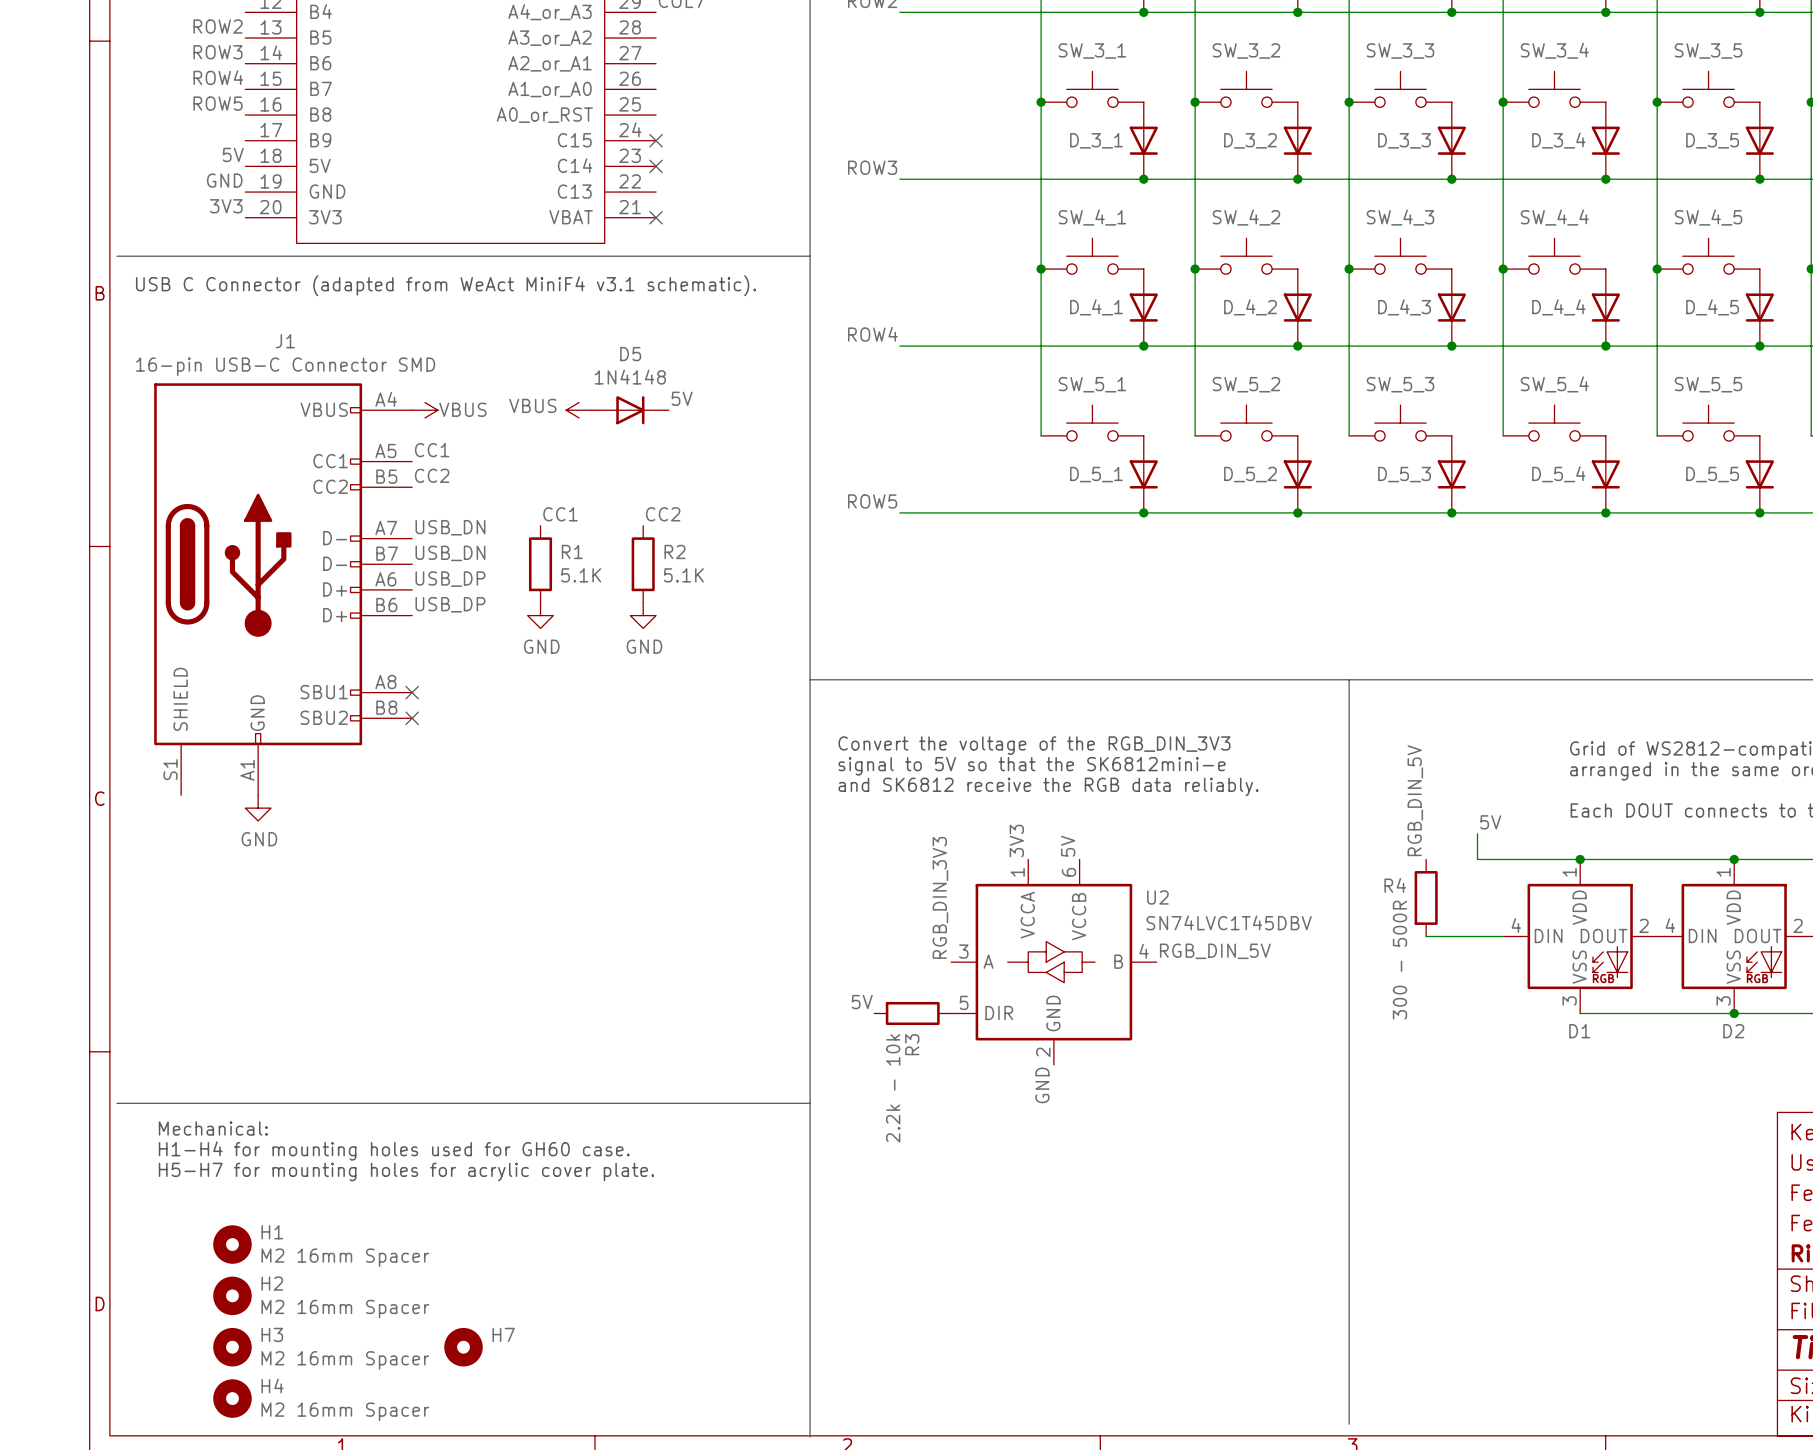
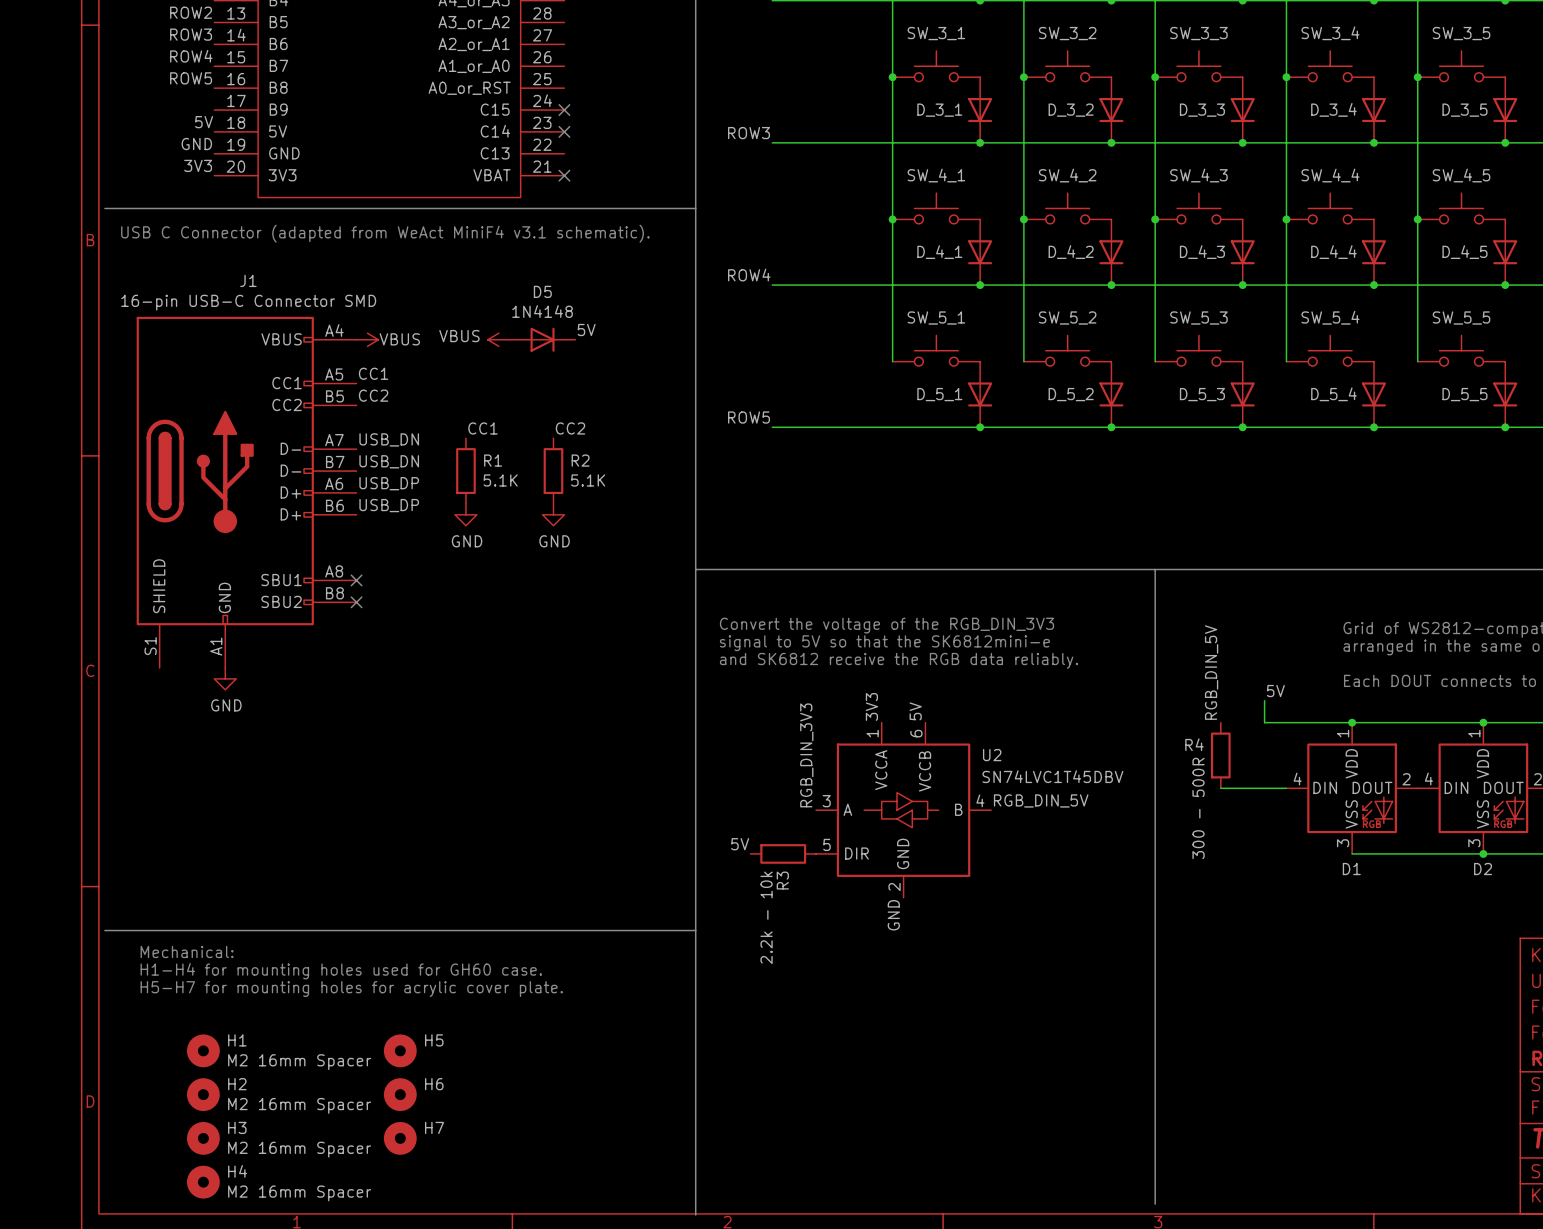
H5: none -> (400, 1050)
H6: none -> (400, 1094)

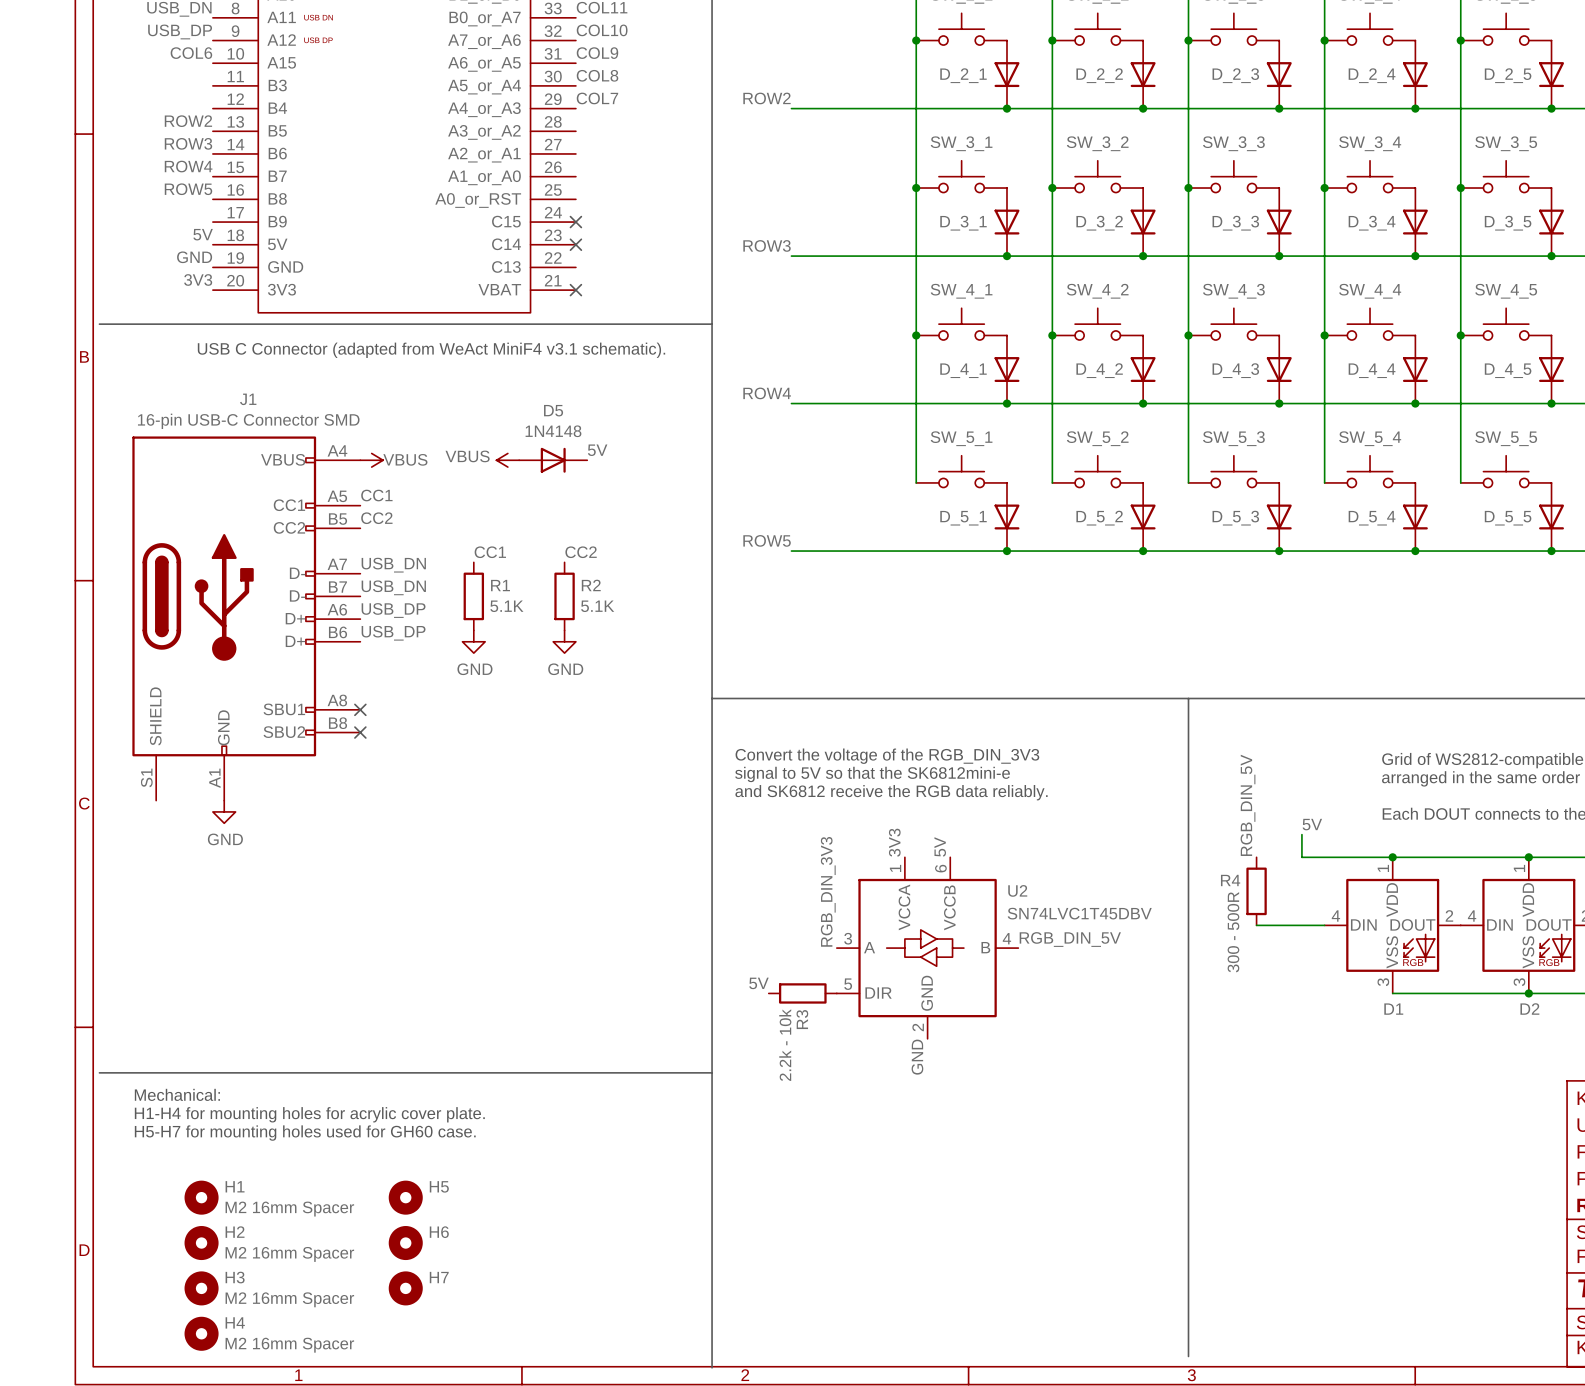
text: H1-H4 for mounting holes used for GH60 case. (341, 971) -> H1-H4 for mounting holes for acrylic cover plate. (309, 1114)
text: H5-H7 for mounting holes for acrylic cover plate. (351, 989) -> H5-H7 for mounting holes used for GH60 case. (305, 1133)

